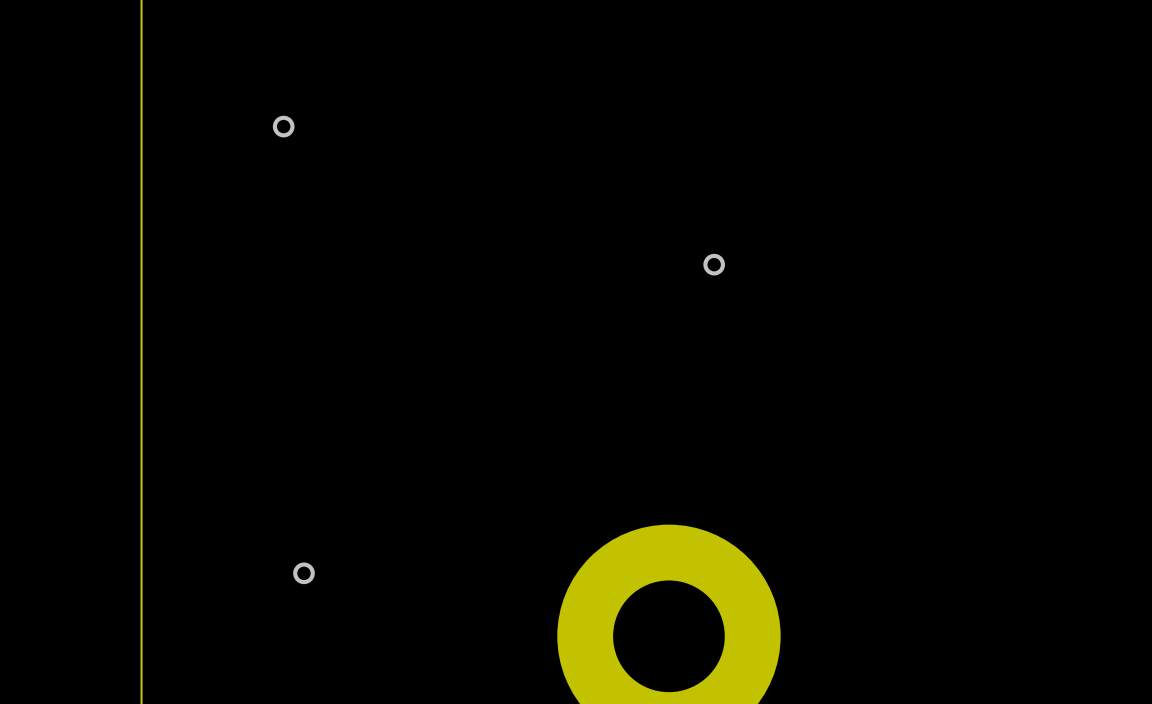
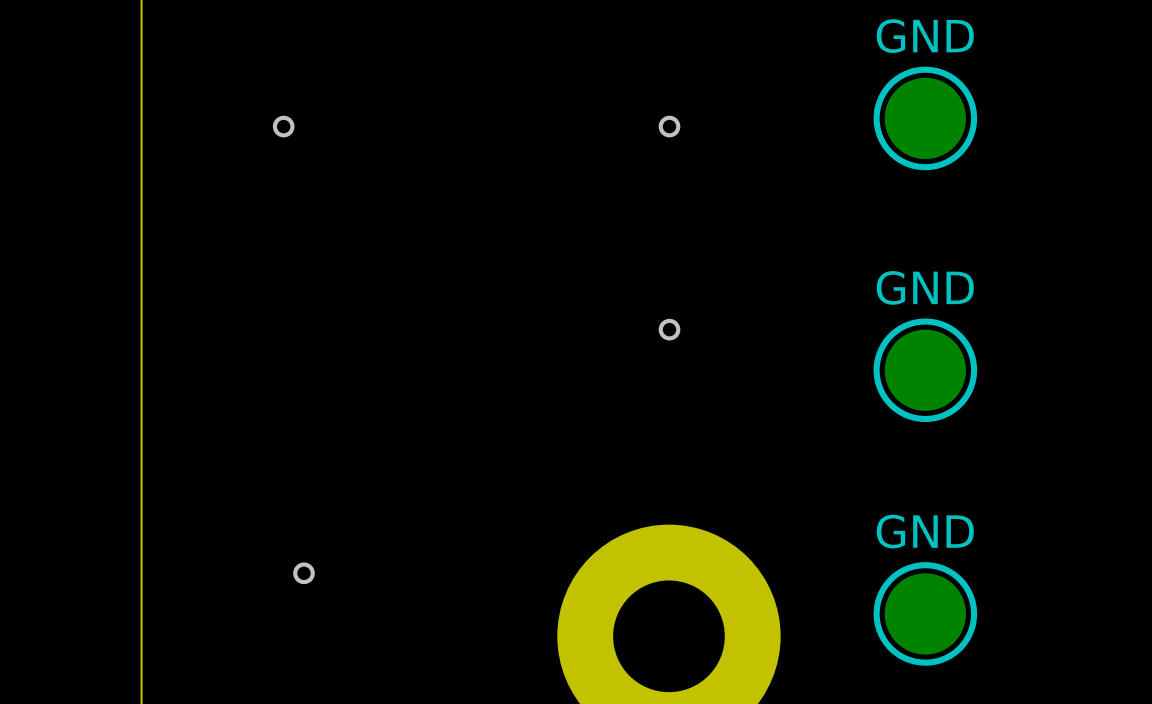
GND: none -> (925, 118)
via: none -> (669, 126)
via: (714, 264) -> none
via: none -> (669, 329)
GND: none -> (925, 370)
GND: none -> (925, 613)

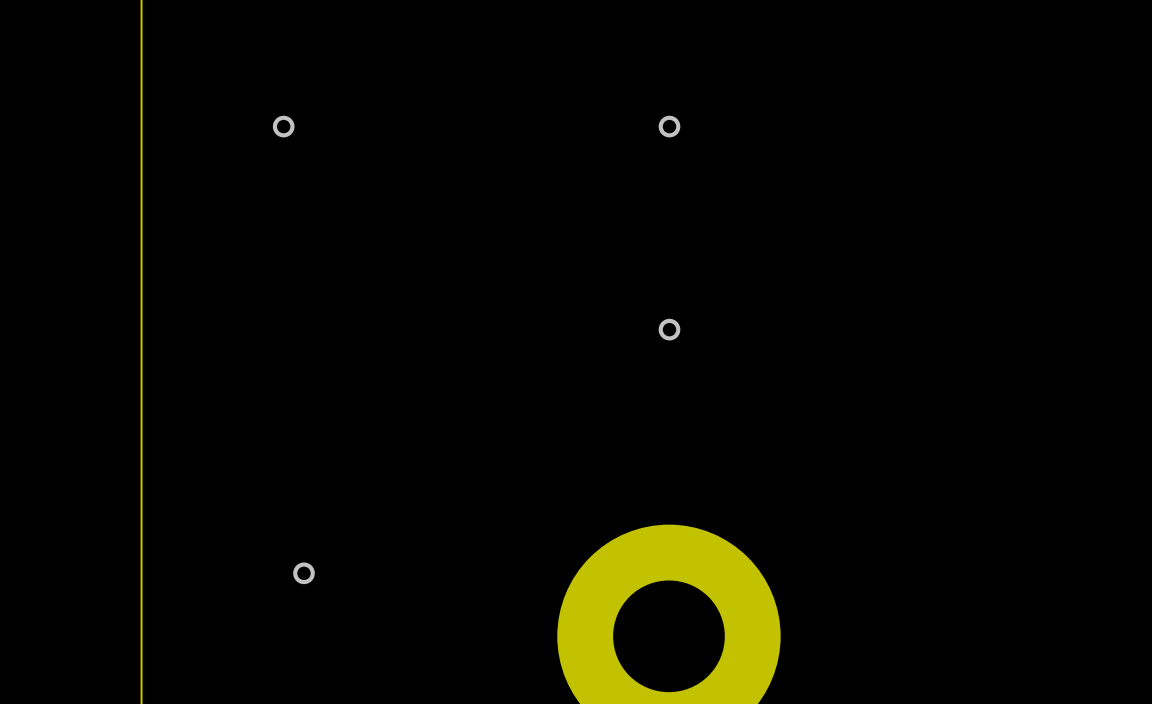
GND: (925, 118) -> none
GND: (925, 370) -> none
GND: (925, 613) -> none

